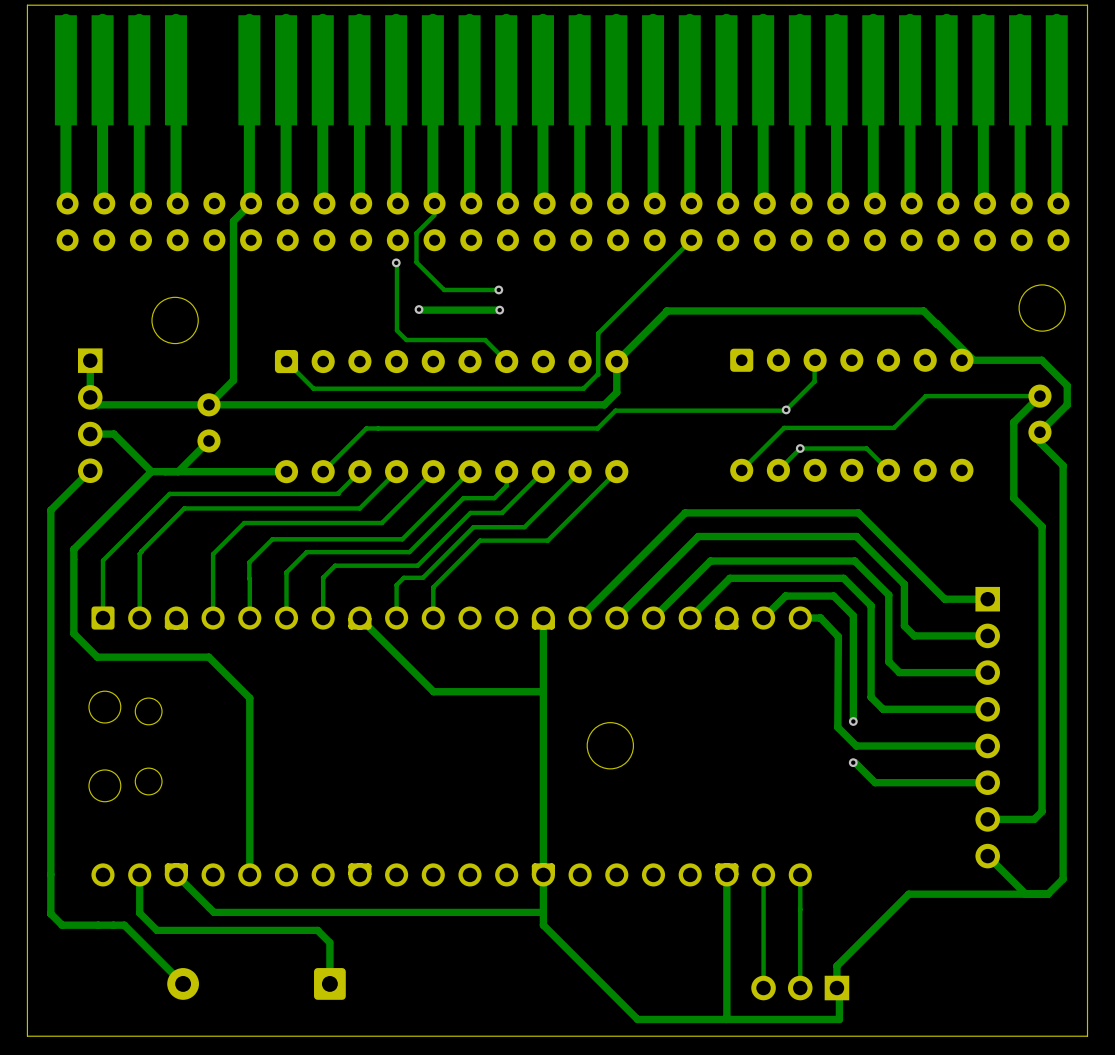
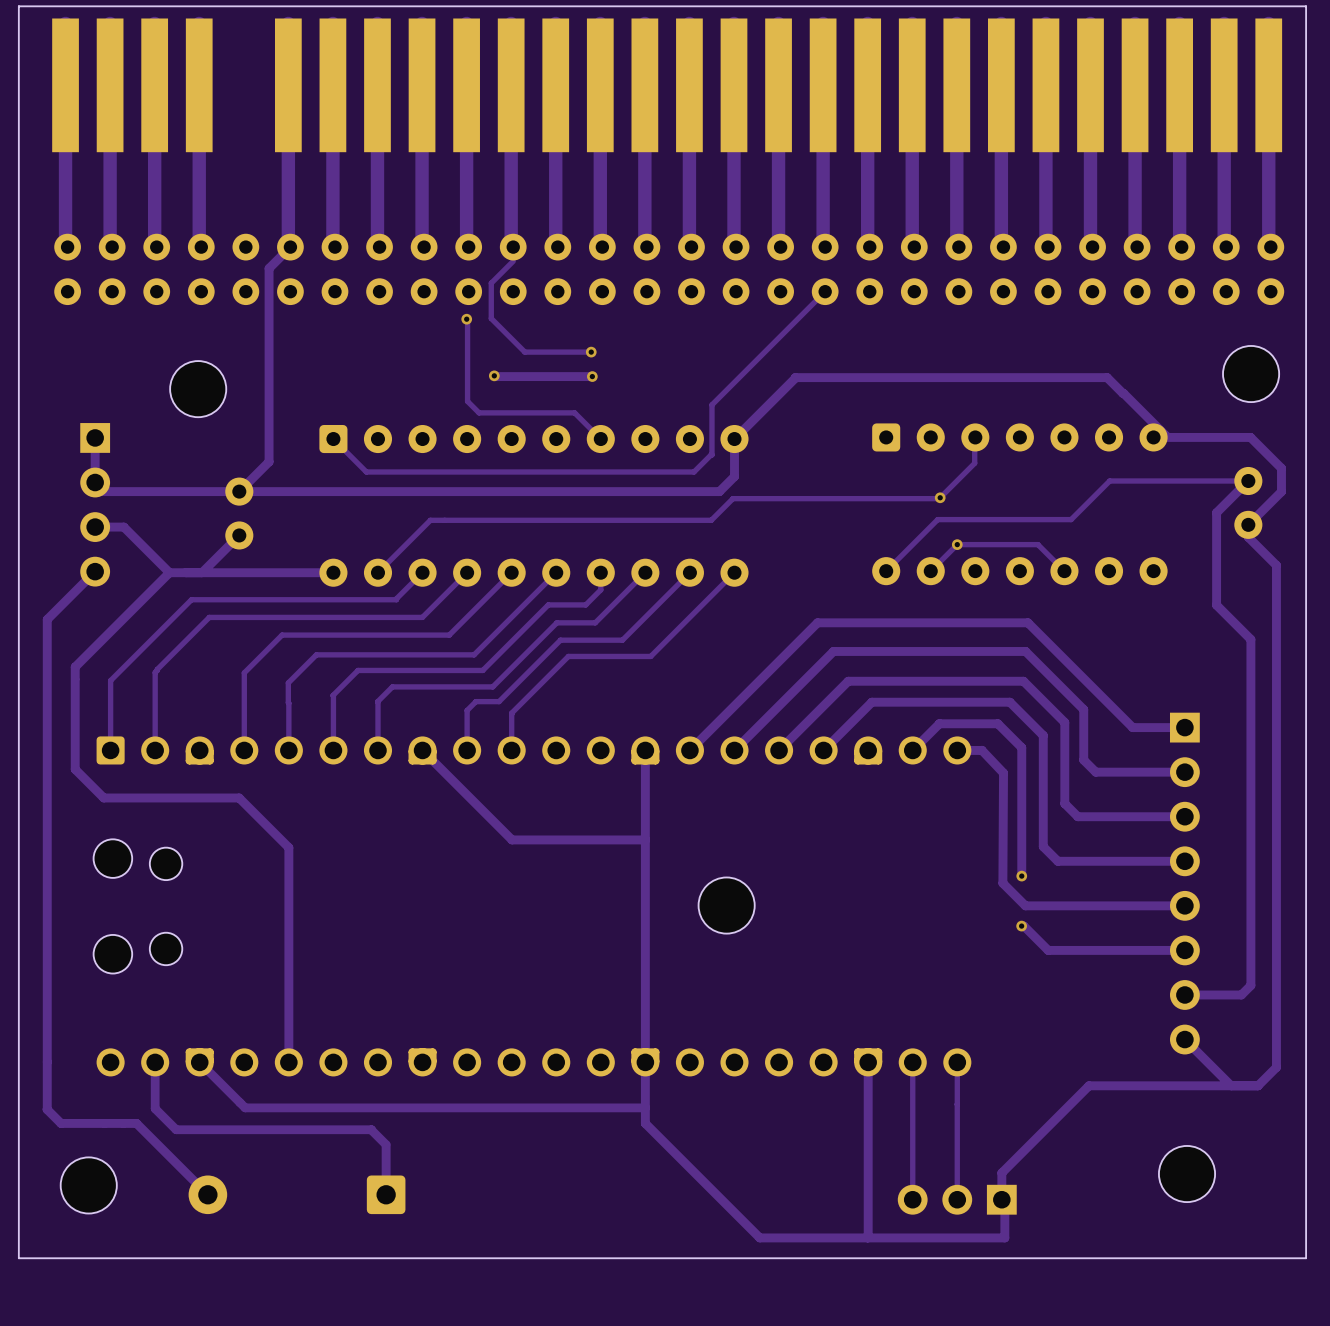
part: none -> (1187, 1174)
part: none -> (88, 1185)

